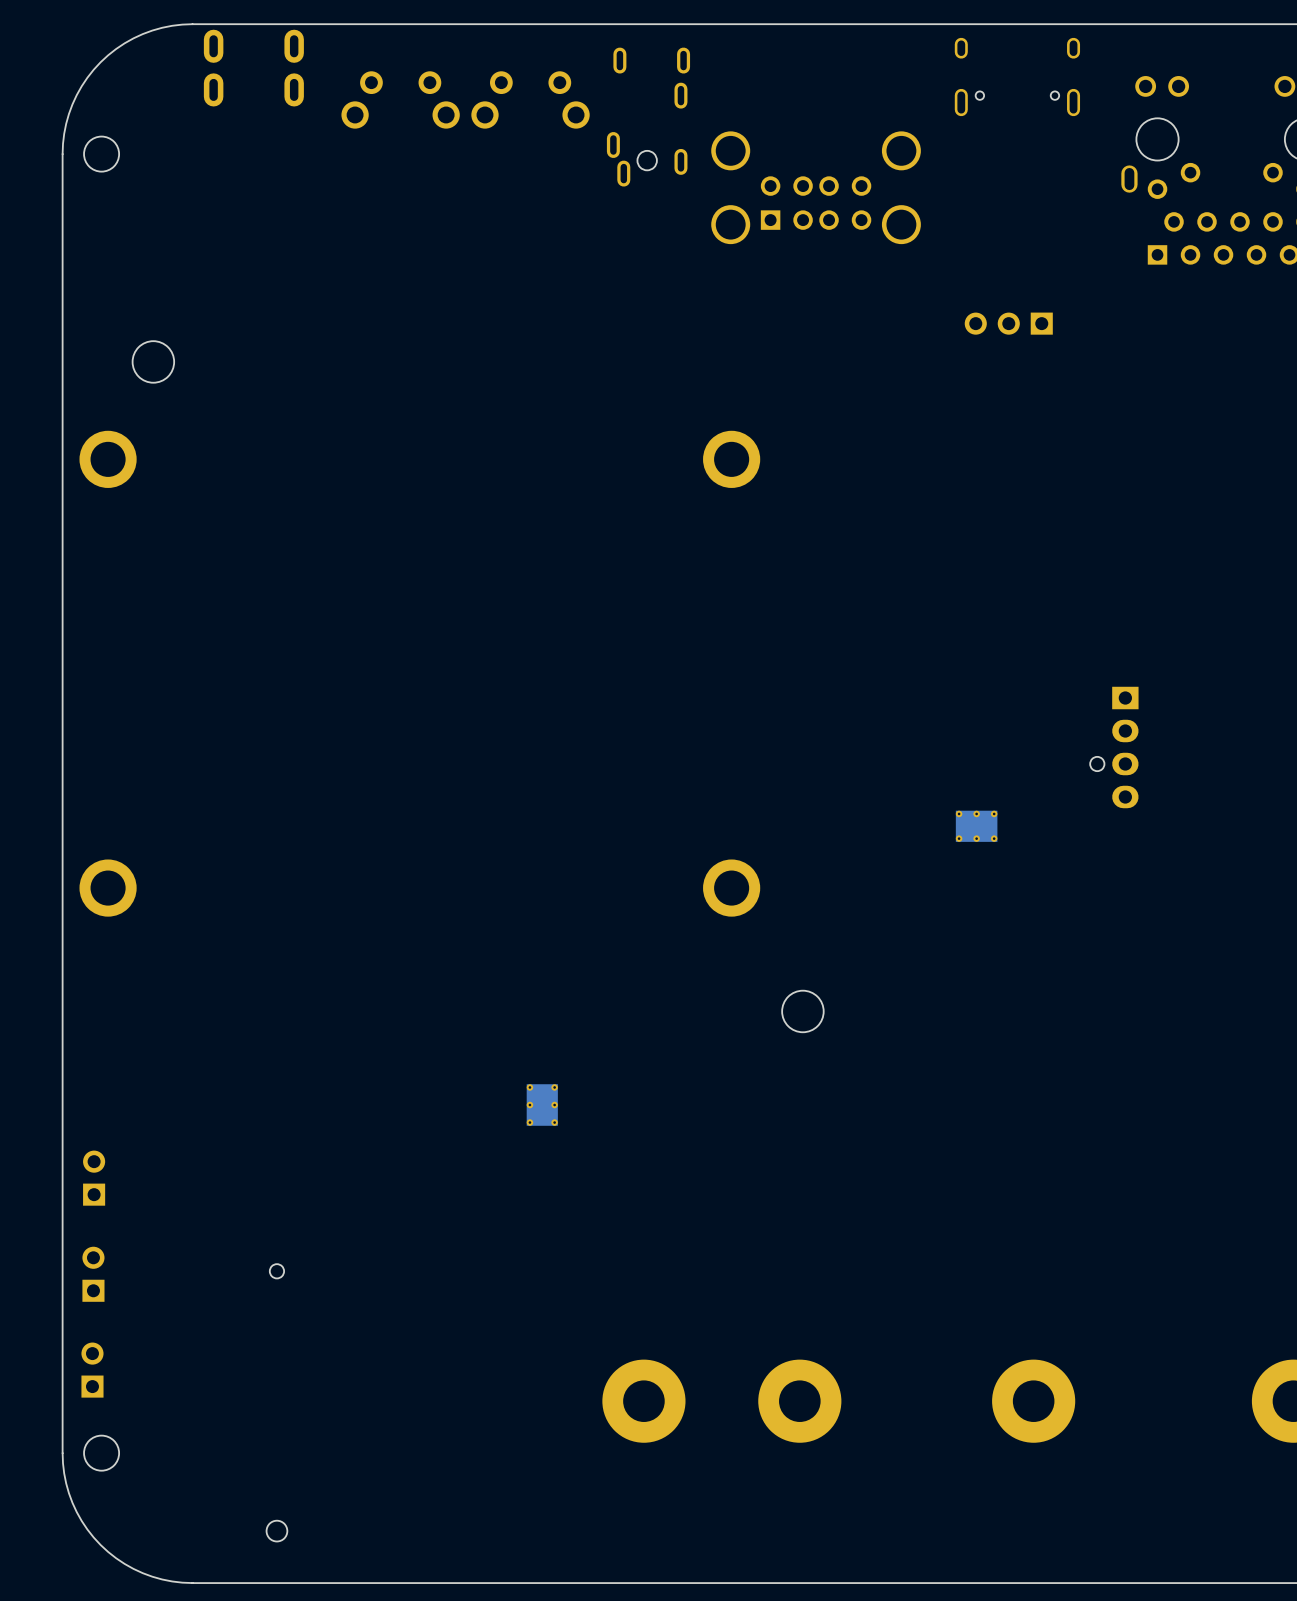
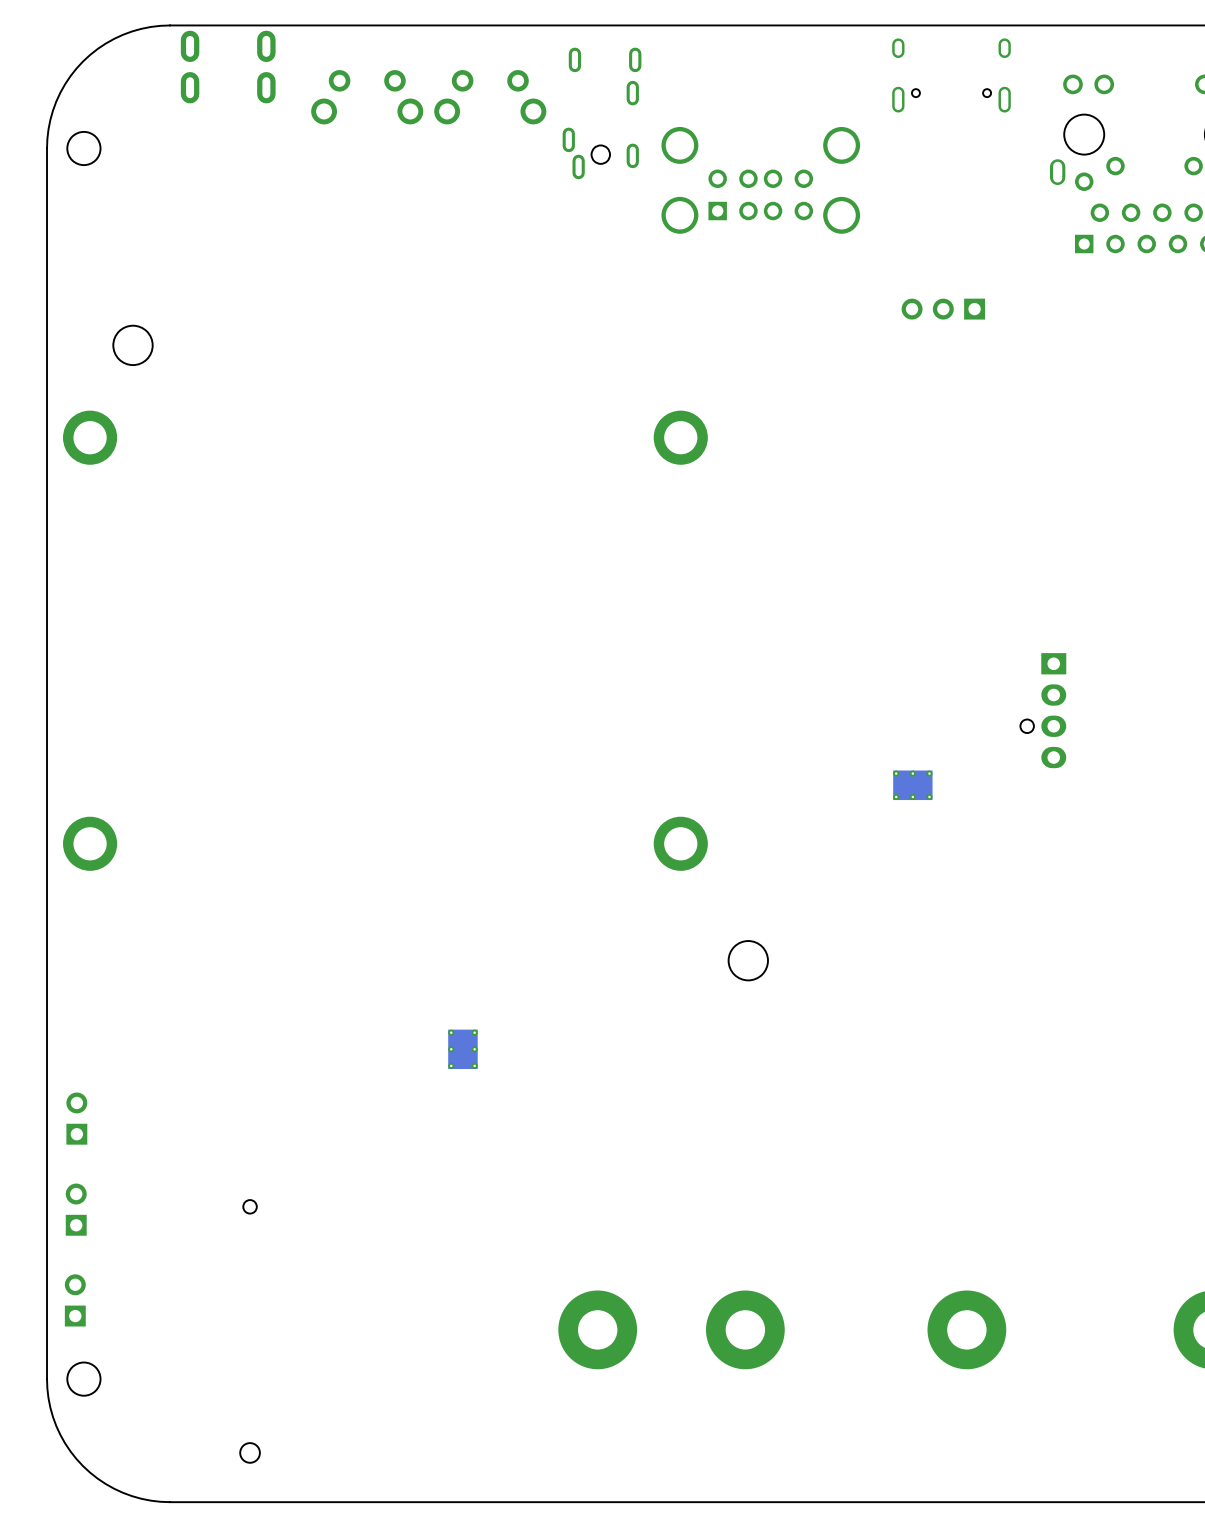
part position: (542, 1105) -> (462, 1049)

